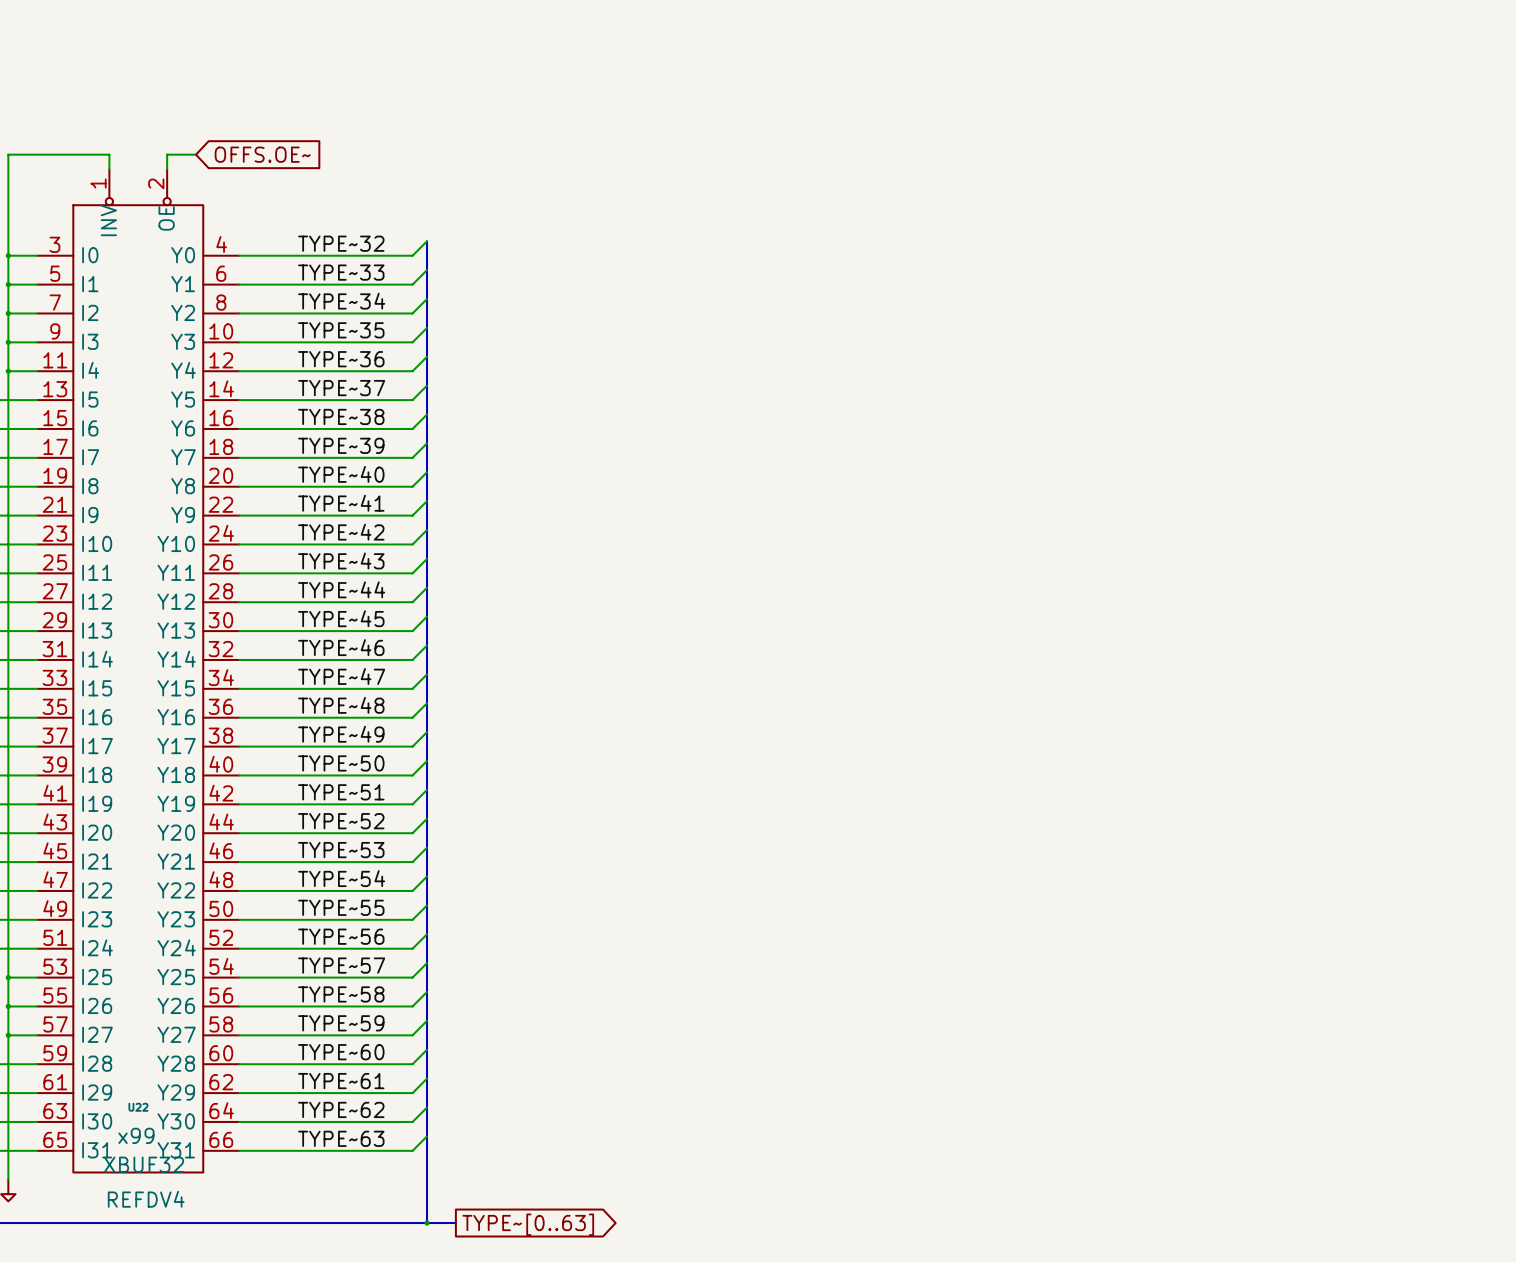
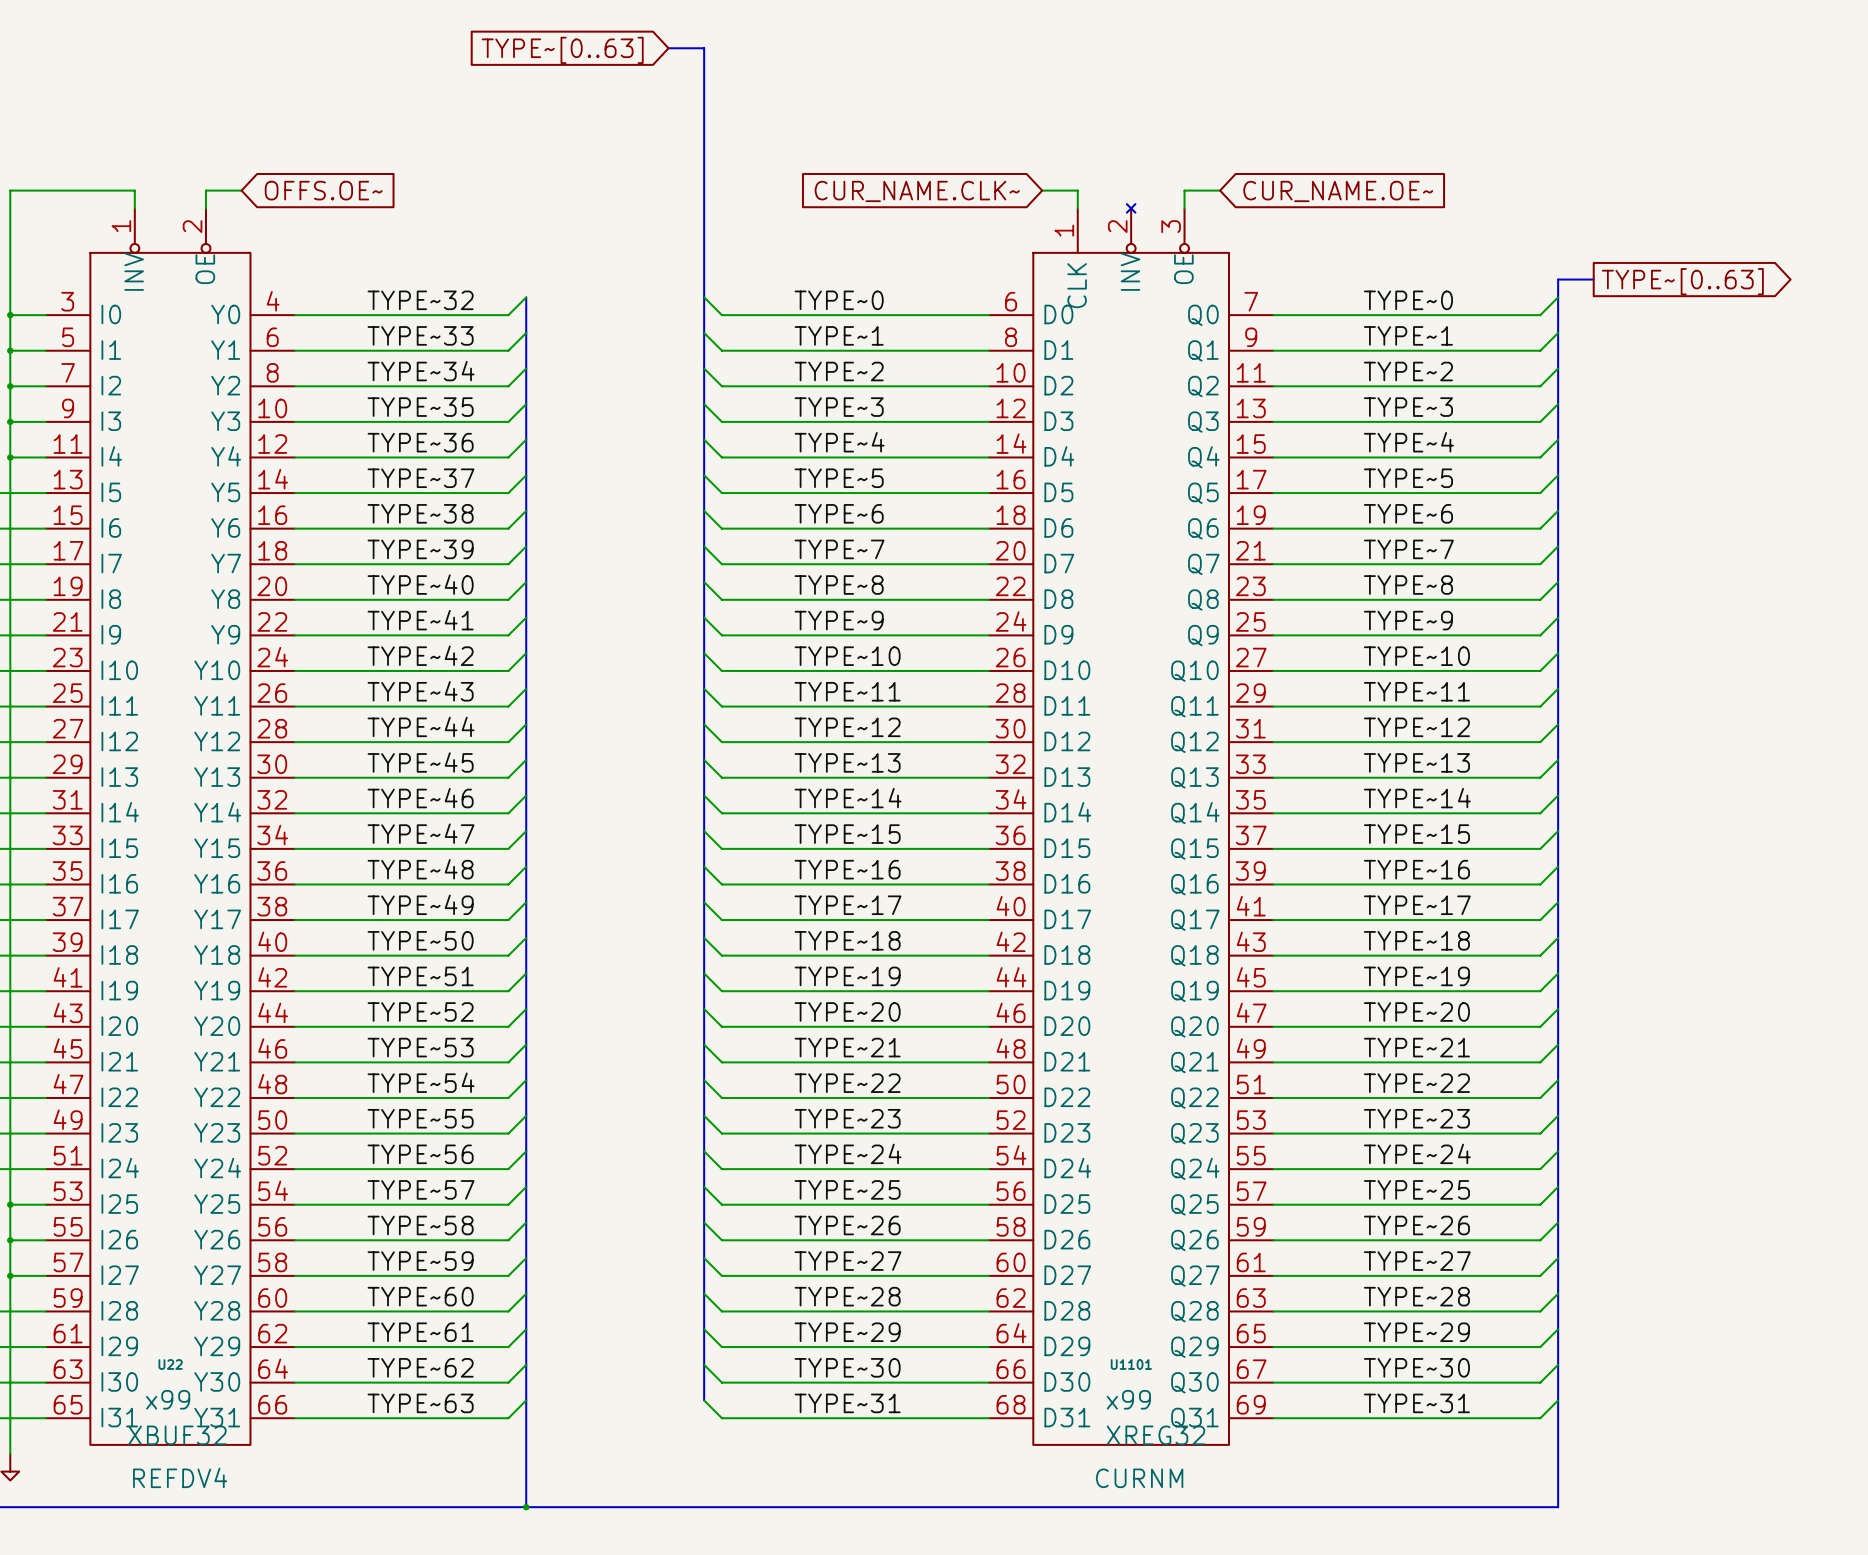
bus: none -> (668, 48) (704, 48) (704, 1400)
global label: none -> TYPE~[0..63] (562, 50)
wire: none -> (1042, 190) (1077, 190) (1077, 208)
wire: none -> (1220, 190) (1184, 190) (1184, 208)
global label: none -> CUR_NAME.CLK~ (917, 191)
global label: none -> CUR_NAME.OE~ (1338, 191)
no-connect mark: none -> (1131, 208)
bus: none -> (1593, 279) (1558, 279) (1558, 1507) (561, 1507)
global label: none -> TYPE~[0..63] (1682, 281)
wire: none -> (704, 297) (721, 315) (988, 315)
wire: none -> (1558, 297) (1540, 315) (1273, 315)
label: none -> TYPE~0 (839, 300)
label: none -> TYPE~0 (1408, 300)
wire: none -> (704, 332) (721, 350) (988, 350)
wire: none -> (1558, 332) (1540, 350) (1273, 350)
label: none -> TYPE~1 (839, 335)
label: none -> TYPE~1 (1408, 335)
wire: none -> (704, 368) (721, 386) (988, 386)
wire: none -> (1558, 368) (1540, 386) (1273, 386)
label: none -> TYPE~2 (839, 371)
label: none -> TYPE~2 (1408, 371)
wire: none -> (704, 404) (721, 421) (988, 421)
wire: none -> (1558, 404) (1540, 421) (1273, 421)
label: none -> TYPE~3 (839, 407)
label: none -> TYPE~3 (1408, 407)
wire: none -> (704, 439) (721, 457) (988, 457)
wire: none -> (1558, 439) (1540, 457) (1273, 457)
label: none -> TYPE~4 (839, 442)
label: none -> TYPE~4 (1408, 442)
wire: none -> (704, 475) (721, 493) (988, 493)
wire: none -> (1558, 475) (1540, 493) (1273, 493)
label: none -> TYPE~5 (839, 478)
label: none -> TYPE~5 (1408, 478)
wire: none -> (704, 510) (721, 528) (988, 528)
wire: none -> (1558, 510) (1540, 528) (1273, 528)
label: none -> TYPE~6 (839, 513)
label: none -> TYPE~6 (1408, 513)
wire: none -> (704, 546) (721, 564) (988, 564)
wire: none -> (1558, 546) (1540, 564) (1273, 564)
label: none -> TYPE~7 (839, 549)
label: none -> TYPE~7 (1408, 549)
wire: none -> (704, 582) (721, 599) (988, 599)
wire: none -> (1558, 582) (1540, 599) (1273, 599)
label: none -> TYPE~8 (839, 584)
label: none -> TYPE~8 (1408, 584)
wire: none -> (704, 617) (721, 635) (988, 635)
wire: none -> (1558, 617) (1540, 635) (1273, 635)
label: none -> TYPE~9 (839, 620)
label: none -> TYPE~9 (1408, 620)
wire: none -> (704, 653) (721, 670) (988, 670)
wire: none -> (1558, 653) (1540, 670) (1273, 670)
label: none -> TYPE~10 (847, 656)
label: none -> TYPE~10 (1416, 656)
wire: none -> (704, 688) (721, 706) (988, 706)
wire: none -> (1558, 688) (1540, 706) (1273, 706)
label: none -> TYPE~11 (847, 691)
label: none -> TYPE~11 (1416, 691)
wire: none -> (704, 724) (721, 742) (988, 742)
wire: none -> (1558, 724) (1540, 742) (1273, 742)
label: none -> TYPE~12 (847, 727)
label: none -> TYPE~12 (1416, 727)
wire: none -> (704, 759) (721, 777) (988, 777)
wire: none -> (1558, 759) (1540, 777) (1273, 777)
label: none -> TYPE~13 (847, 762)
label: none -> TYPE~13 (1416, 762)
wire: none -> (704, 795) (721, 813) (988, 813)
wire: none -> (1558, 795) (1540, 813) (1273, 813)
label: none -> TYPE~14 (848, 798)
label: none -> TYPE~14 (1417, 798)
U1101: none -> XREG32 (1131, 826)
wire: none -> (704, 831) (721, 848) (988, 848)
wire: none -> (1558, 831) (1540, 848) (1273, 848)
label: none -> TYPE~15 (847, 834)
label: none -> TYPE~15 (1416, 834)
wire: none -> (704, 866) (721, 884) (988, 884)
wire: none -> (1558, 866) (1540, 884) (1273, 884)
label: none -> TYPE~16 (847, 869)
label: none -> TYPE~16 (1416, 869)
wire: none -> (704, 902) (721, 920) (988, 920)
wire: none -> (1558, 902) (1540, 920) (1273, 920)
label: none -> TYPE~17 (848, 905)
label: none -> TYPE~17 (1417, 905)
wire: none -> (704, 937) (721, 955) (988, 955)
wire: none -> (1558, 937) (1540, 955) (1273, 955)
label: none -> TYPE~18 (847, 940)
label: none -> TYPE~18 (1416, 940)
wire: none -> (704, 973) (721, 991) (988, 991)
wire: none -> (1558, 973) (1540, 991) (1273, 991)
label: none -> TYPE~19 (847, 976)
label: none -> TYPE~19 (1416, 976)
wire: none -> (704, 1009) (721, 1026) (988, 1026)
wire: none -> (1558, 1009) (1540, 1026) (1273, 1026)
label: none -> TYPE~20 (847, 1011)
label: none -> TYPE~20 (1416, 1011)
wire: none -> (704, 1044) (721, 1062) (988, 1062)
wire: none -> (1558, 1044) (1540, 1062) (1273, 1062)
label: none -> TYPE~21 (847, 1047)
label: none -> TYPE~21 (1416, 1047)
wire: none -> (704, 1080) (721, 1097) (988, 1097)
wire: none -> (1558, 1080) (1540, 1097) (1273, 1097)
label: none -> TYPE~22 (847, 1083)
label: none -> TYPE~22 (1416, 1083)
wire: none -> (704, 1115) (721, 1133) (988, 1133)
wire: none -> (1558, 1115) (1540, 1133) (1273, 1133)
label: none -> TYPE~23 (847, 1118)
label: none -> TYPE~23 (1416, 1118)
wire: none -> (704, 1151) (721, 1169) (988, 1169)
wire: none -> (1558, 1151) (1540, 1169) (1273, 1169)
label: none -> TYPE~24 (848, 1153)
label: none -> TYPE~24 (1417, 1153)
wire: none -> (704, 1186) (721, 1204) (988, 1204)
wire: none -> (1558, 1186) (1540, 1204) (1273, 1204)
label: none -> TYPE~25 (847, 1189)
label: none -> TYPE~25 (1416, 1189)
wire: none -> (704, 1222) (721, 1240) (988, 1240)
wire: none -> (1558, 1222) (1540, 1240) (1273, 1240)
label: none -> TYPE~26 (847, 1225)
label: none -> TYPE~26 (1416, 1225)
wire: none -> (704, 1258) (721, 1275) (988, 1275)
wire: none -> (1558, 1258) (1540, 1275) (1273, 1275)
label: none -> TYPE~27 (848, 1261)
label: none -> TYPE~27 (1417, 1261)
wire: none -> (704, 1293) (721, 1311) (988, 1311)
wire: none -> (1558, 1293) (1540, 1311) (1273, 1311)
label: none -> TYPE~28 (847, 1296)
label: none -> TYPE~28 (1416, 1296)
wire: none -> (704, 1329) (721, 1347) (988, 1347)
wire: none -> (1558, 1329) (1540, 1347) (1273, 1347)
label: none -> TYPE~29 (847, 1332)
label: none -> TYPE~29 (1416, 1332)
wire: none -> (704, 1364) (721, 1382) (988, 1382)
wire: none -> (1558, 1364) (1540, 1382) (1273, 1382)
label: none -> TYPE~30 (847, 1367)
label: none -> TYPE~30 (1416, 1367)
wire: none -> (704, 1400) (721, 1418) (988, 1418)
wire: none -> (1558, 1400) (1540, 1418) (1273, 1418)
label: none -> TYPE~31 (847, 1403)
label: none -> TYPE~31 (1416, 1403)
global label: TYPE~[0..63] (528, 1224) -> none

